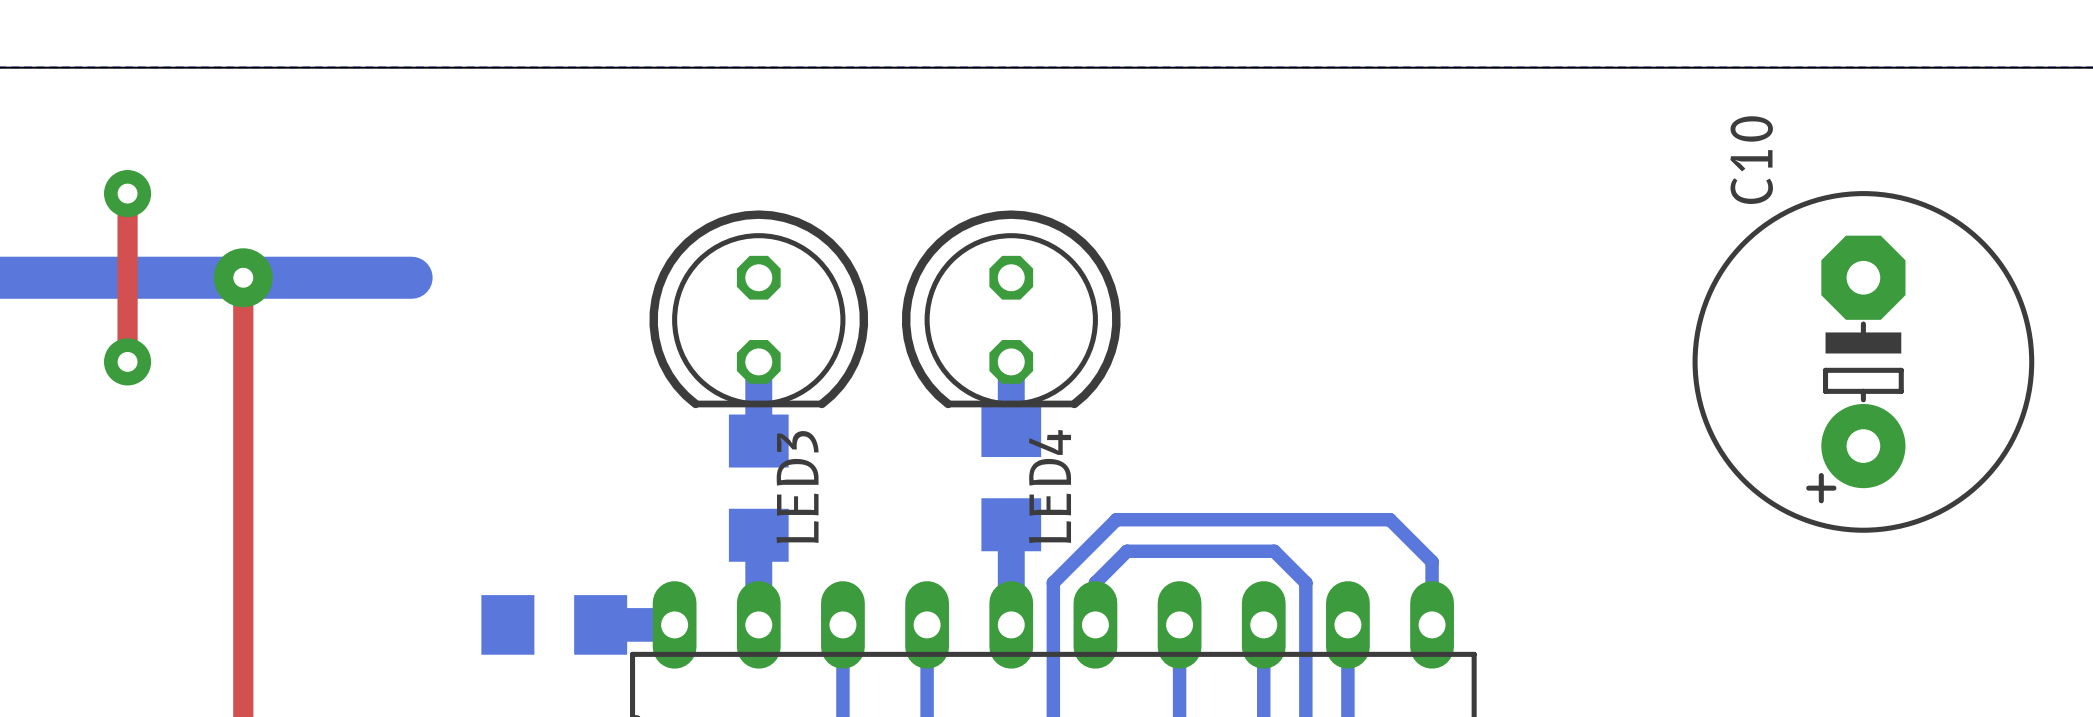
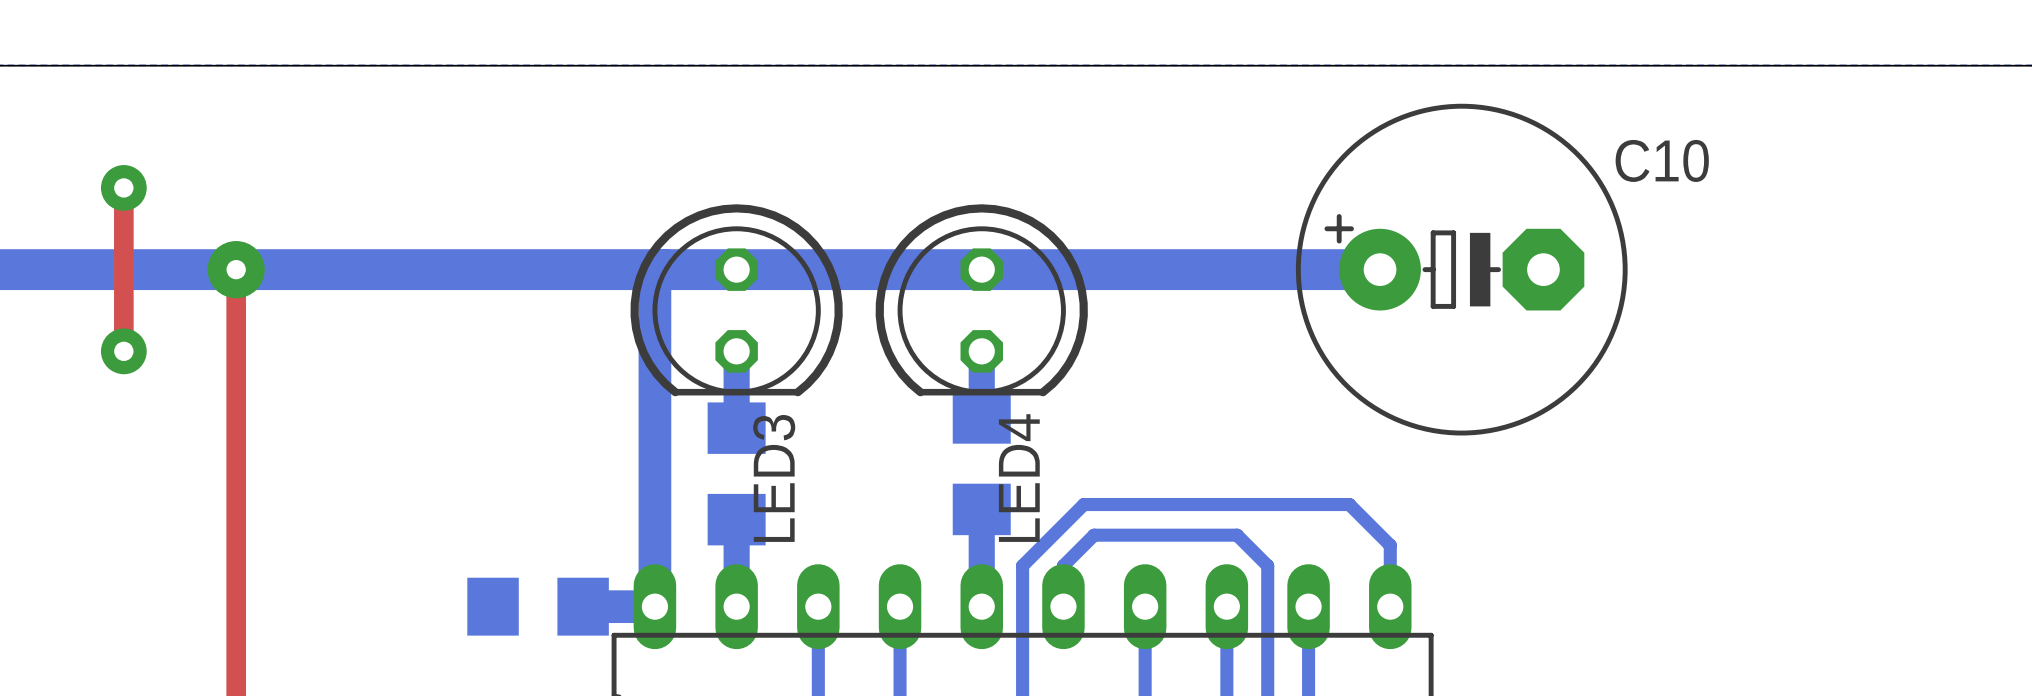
bottom track: none -> (399, 269) (1380, 269)
bottom track: none -> (665, 269) (654, 279) (654, 606)
C10 rotation: 0° (1863, 361) -> 90° clockwise (1461, 269)
C10 position: (1863, 361) -> (1461, 269)

